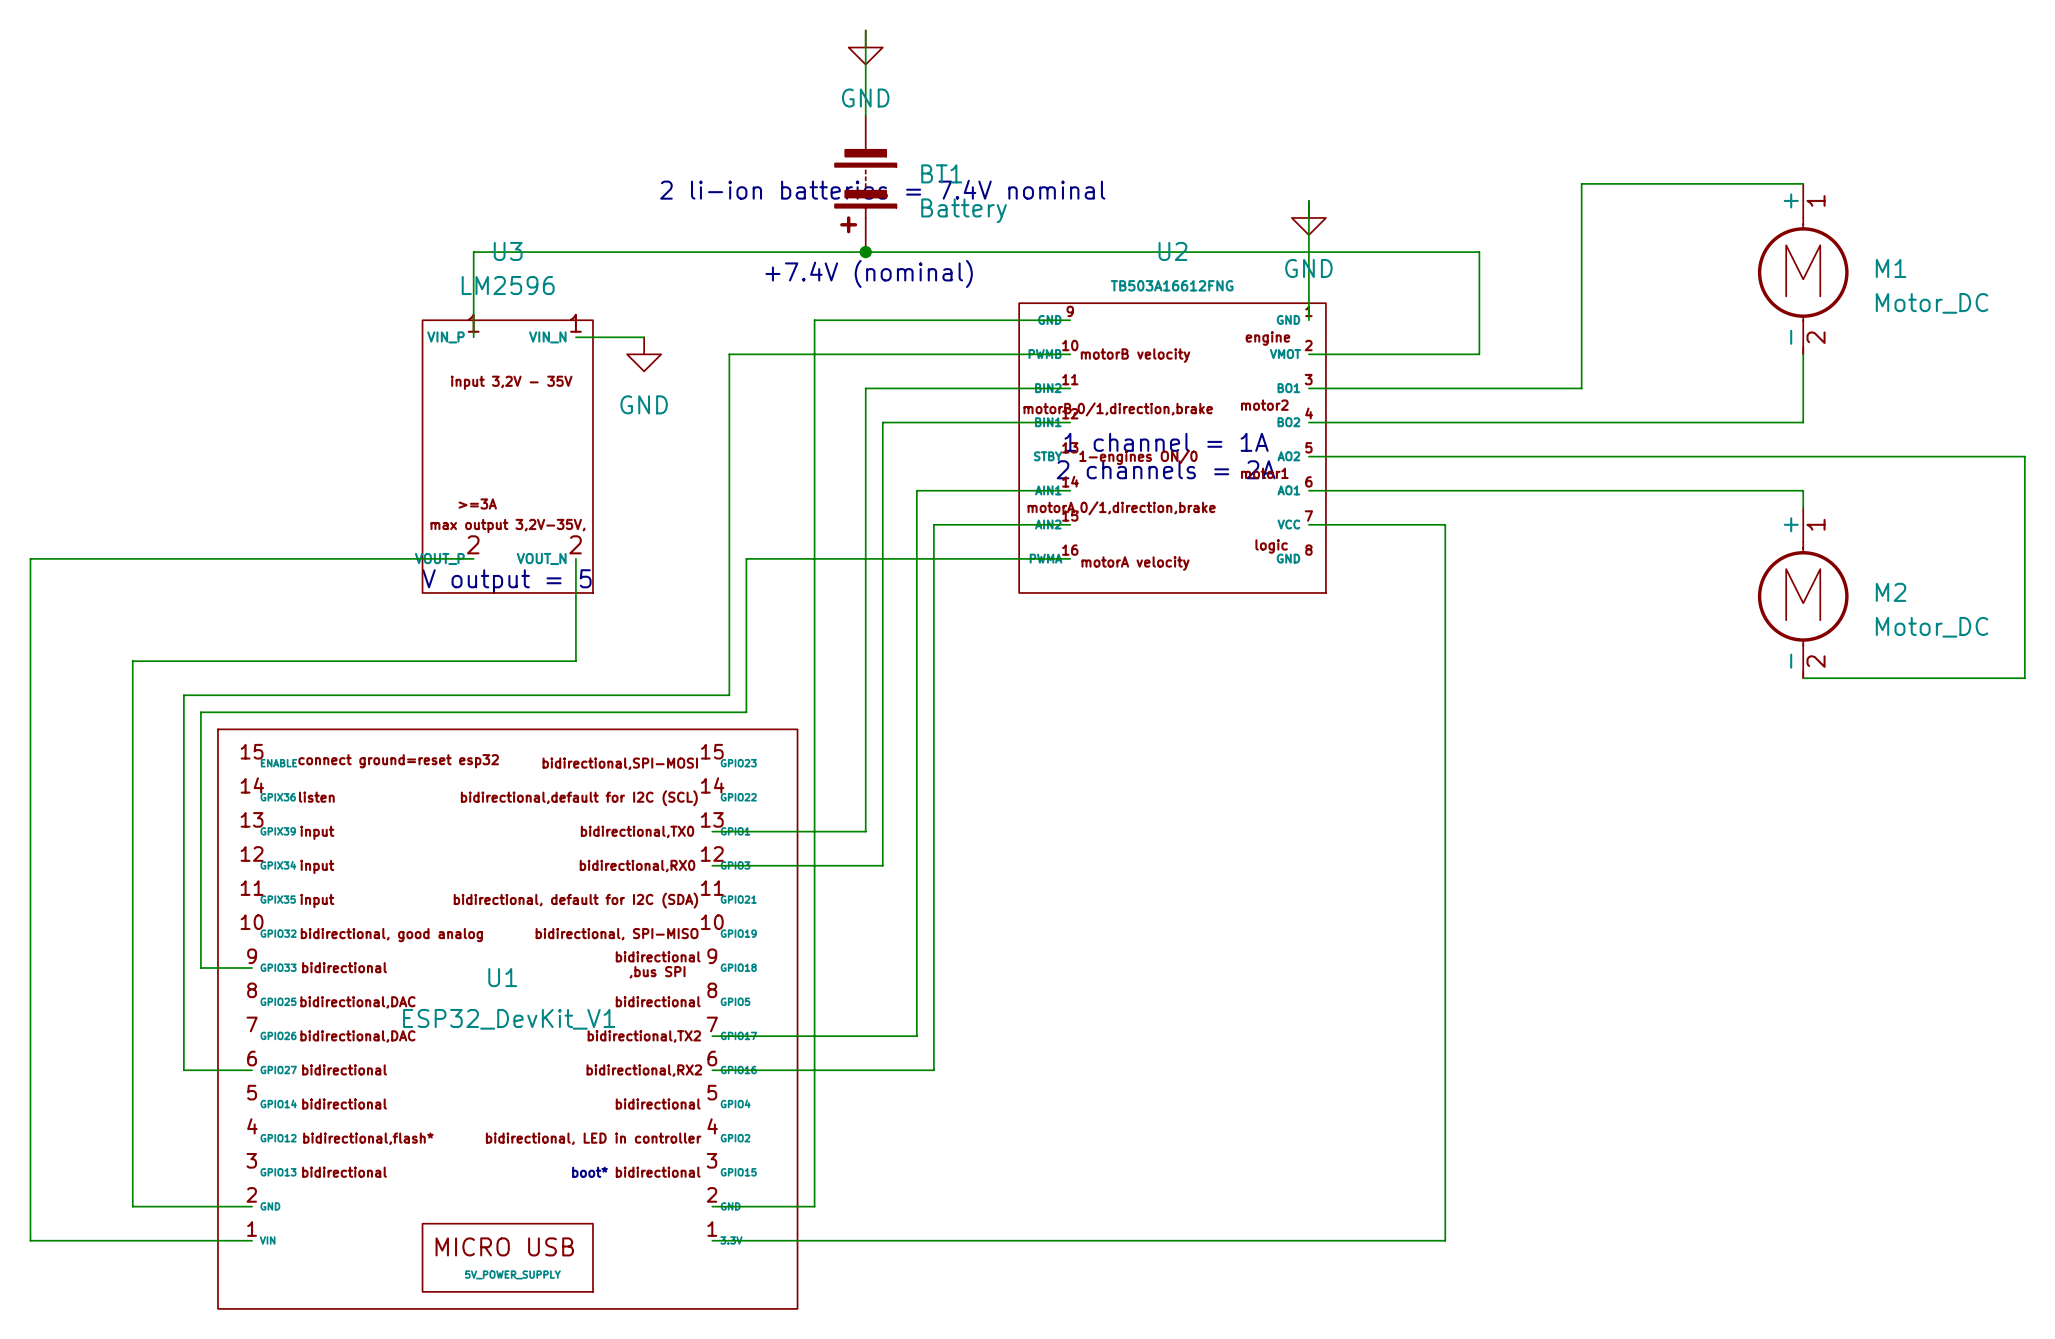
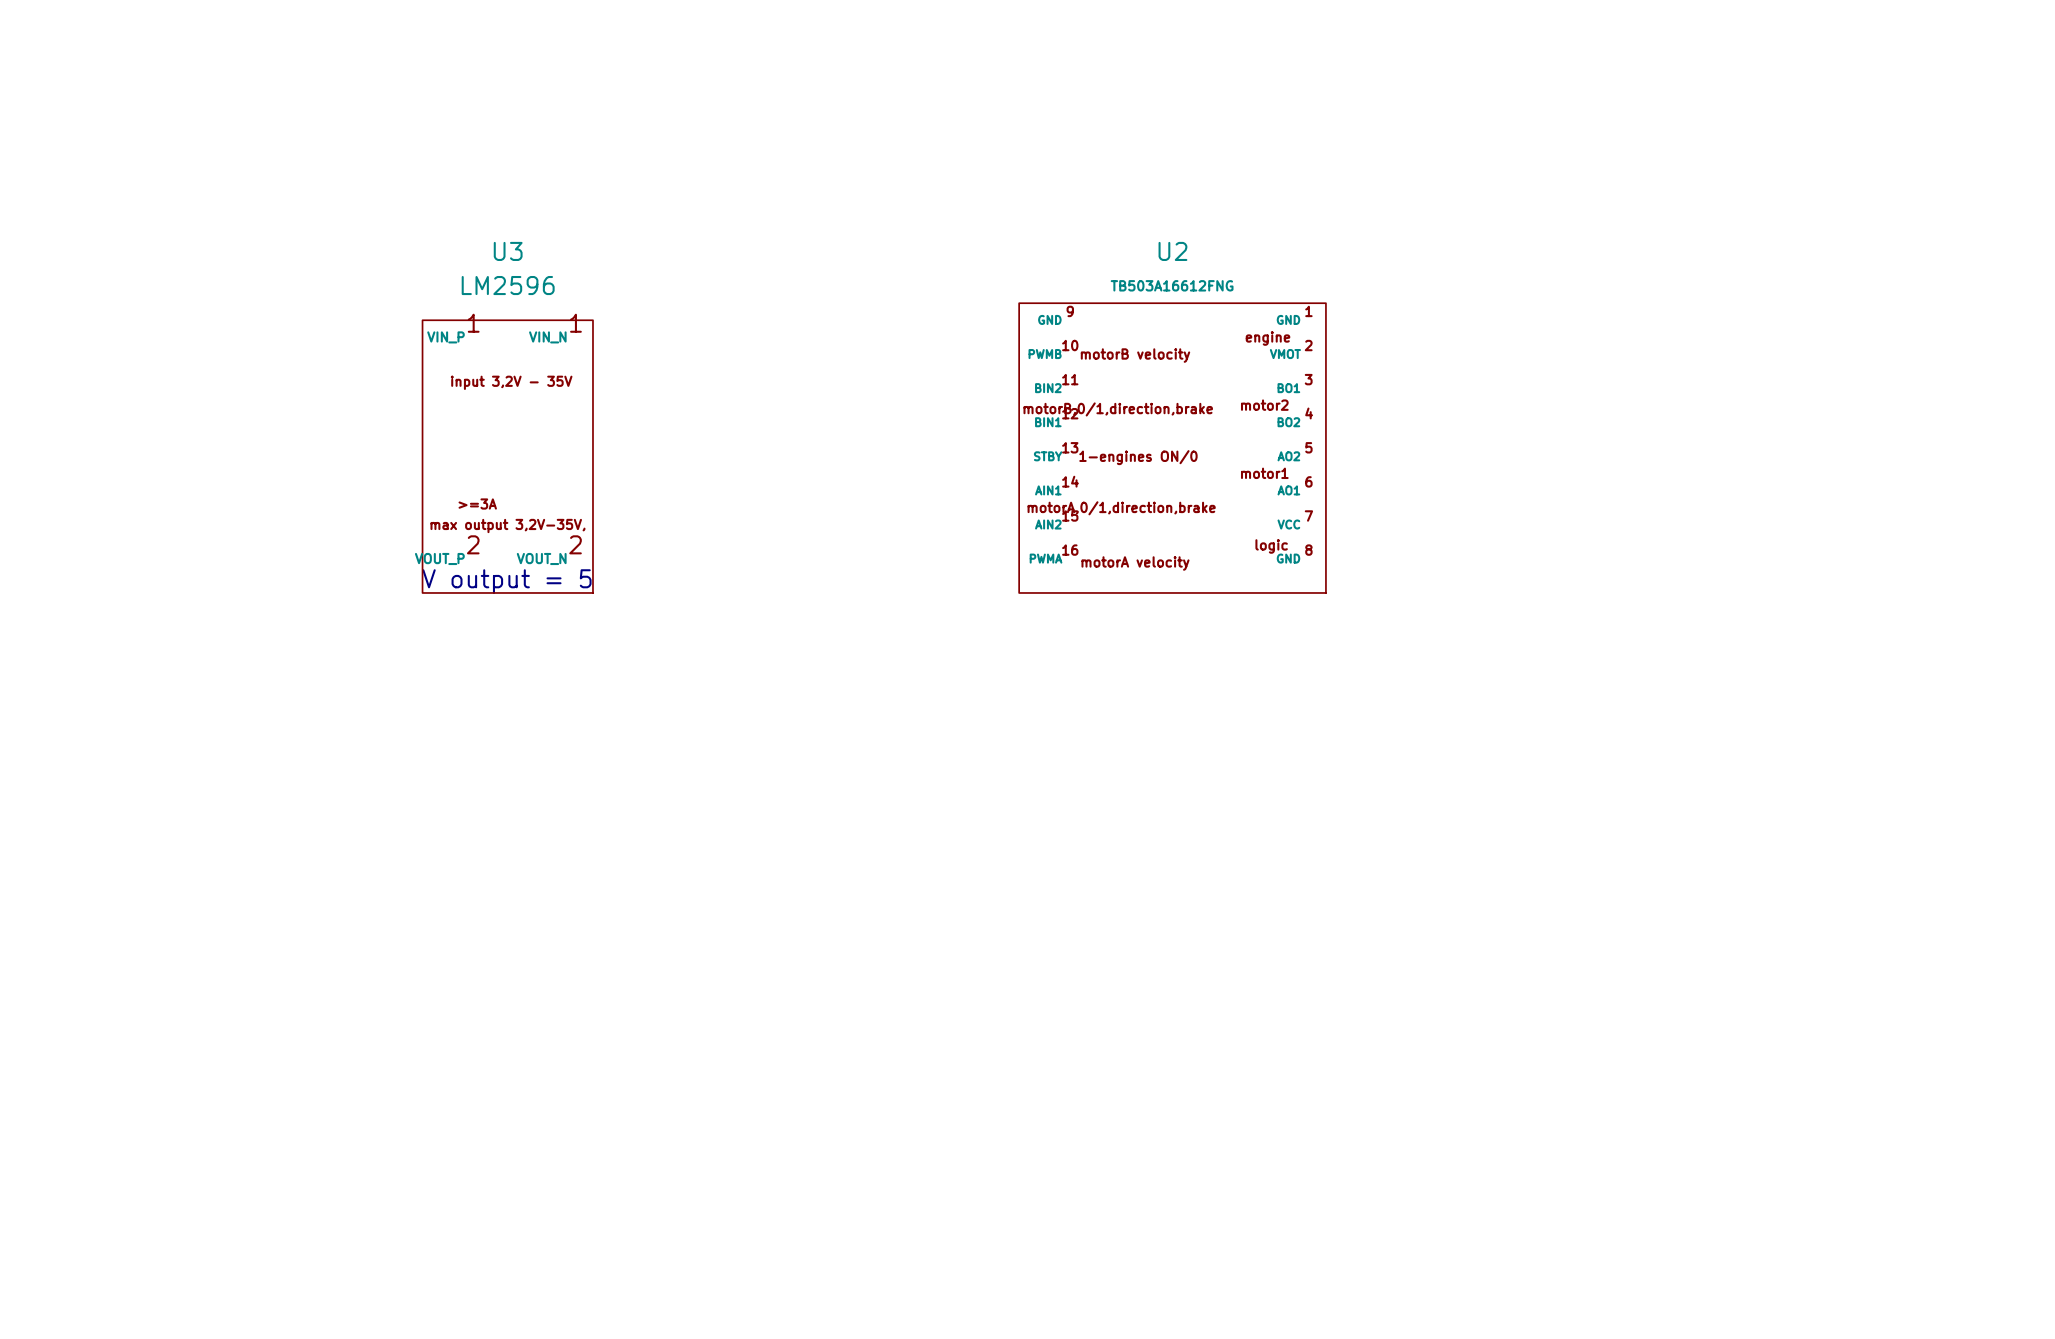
wire: (865, 30) (865, 115) -> none
power symbol: GND (865, 47) -> none
BT1: Battery (865, 183) -> none
wire: (1803, 183) (1581, 183) (1581, 388) (1308, 388) -> none
text: 2 li-ion batteries = 7.4V nominal (882, 189) -> none
wire: (1308, 200) (1308, 320) -> none
power symbol: GND (1308, 217) -> none
junction: (865, 252) -> none
M1: Motor_DC (1803, 269) -> none
text: +7.4V (nominal) (869, 273) -> none
wire: (1070, 320) (814, 320) (814, 1206) (712, 1206) -> none
wire: (473, 337) (473, 252) (1479, 252) (1479, 354) (1308, 354) -> none
wire: (575, 337) (644, 337) -> none
power symbol: GND (644, 354) -> none
wire: (1070, 354) (729, 354) (729, 695) (183, 695) (183, 1070) (252, 1070) -> none
wire: (1803, 354) (1803, 422) (1308, 422) -> none
wire: (1070, 388) (865, 388) (865, 831) (712, 831) -> none
wire: (1070, 422) (882, 422) (882, 865) (712, 865) -> none
text: 1 channel = 1A (1166, 442) -> none
wire: (1308, 456) (2024, 456) (2024, 678) (1803, 678) -> none
text: 2 channels = 2A (1166, 469) -> none
wire: (1070, 490) (916, 490) (916, 1036) (712, 1036) -> none
wire: (1308, 490) (1803, 490) (1803, 507) -> none
wire: (1070, 524) (933, 524) (933, 1070) (712, 1070) -> none
wire: (1308, 524) (1445, 524) (1445, 1240) (712, 1240) -> none
wire: (473, 558) (30, 558) (30, 1240) (252, 1240) -> none
wire: (575, 558) (575, 661) (132, 661) (132, 1206) (252, 1206) -> none
wire: (1070, 558) (746, 558) (746, 712) (200, 712) (200, 967) (252, 967) -> none
M2: Motor_DC (1803, 592) -> none
U1: ESP32_DevKit_V1 (507, 1019) -> none
text: boot* (590, 1172) -> none

